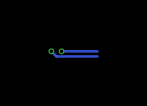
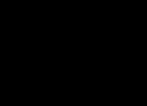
track: (51, 51) (56, 56) (97, 56) -> none
via: (51, 51) -> none
via: (61, 51) -> none
track: (97, 51) (61, 51) -> none

